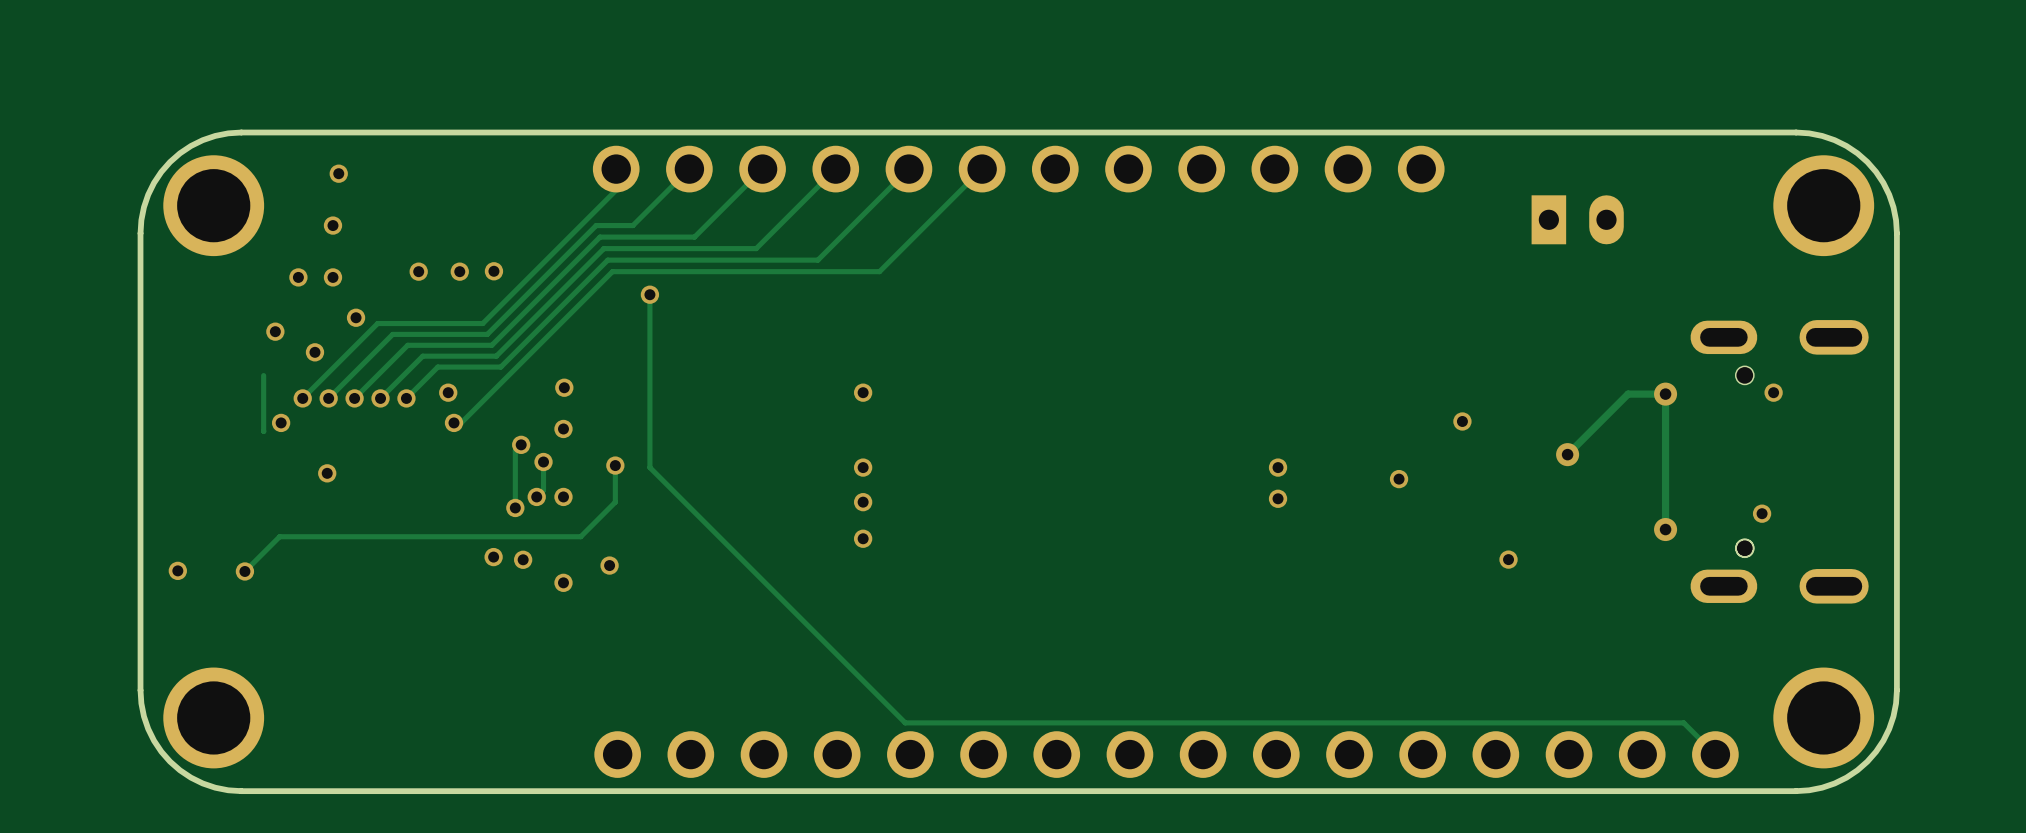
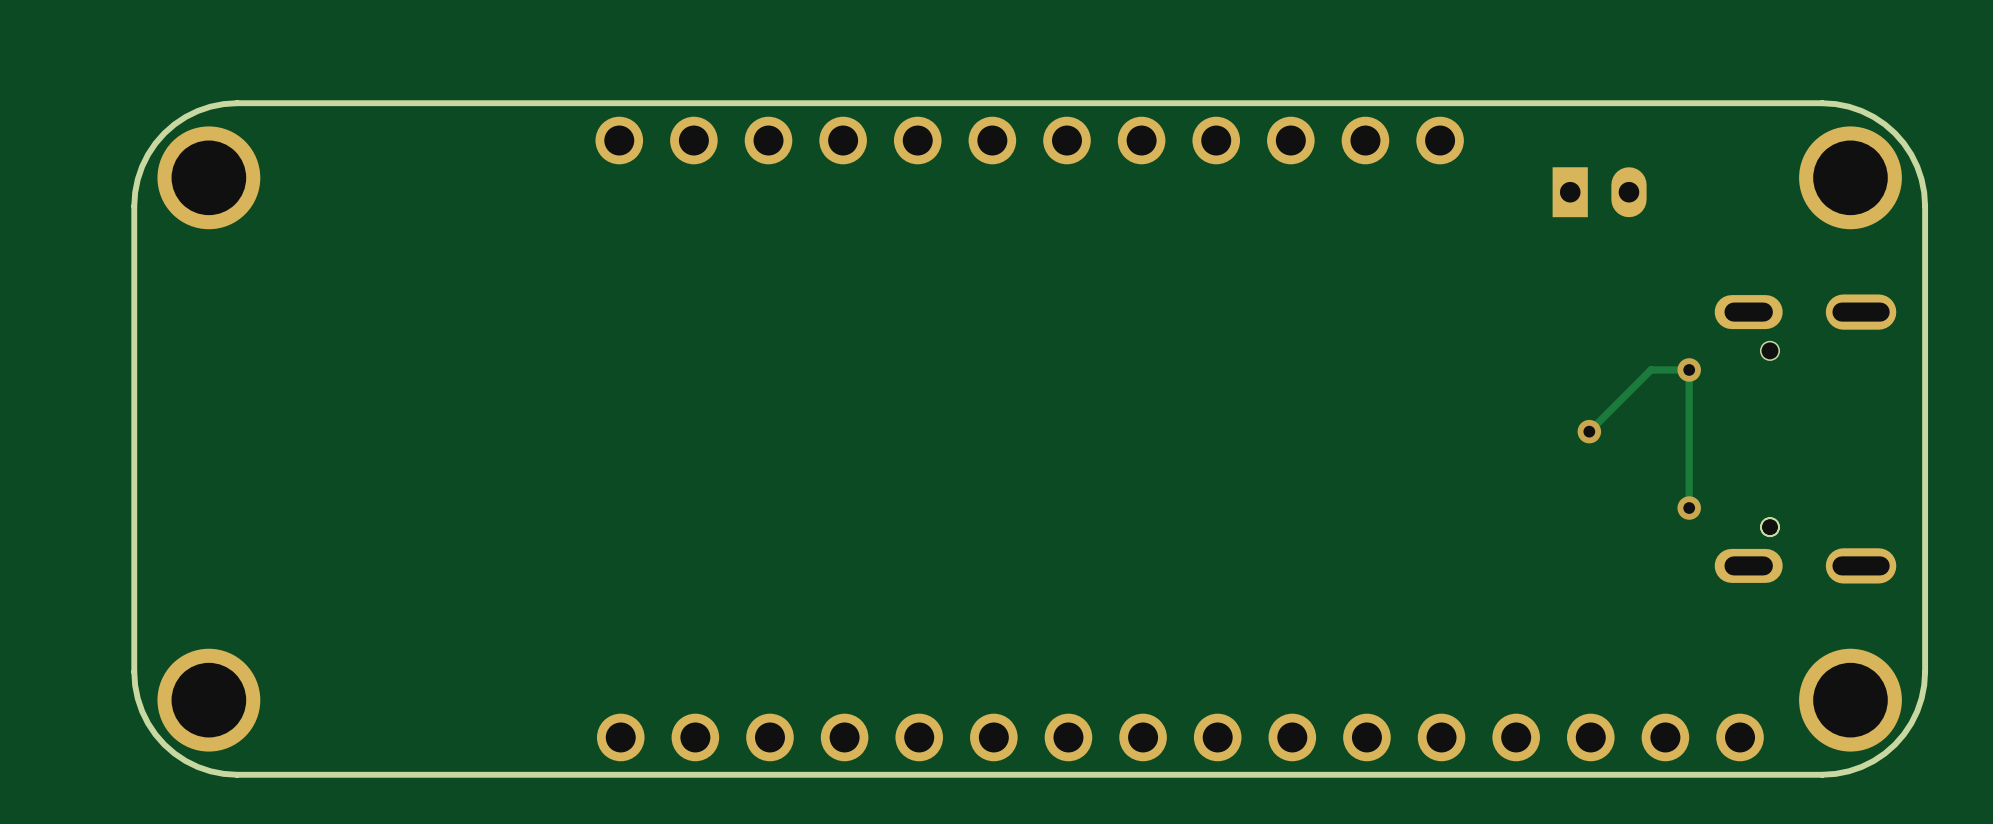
track: (616, 169) (616, 190) (482, 323) (377, 323) (302, 398) -> none
track: (689, 169) (632, 225) (596, 225) (487, 334) (392, 334) (328, 398) -> none
track: (762, 169) (694, 237) (600, 237) (491, 345) (407, 345) (354, 398) -> none
track: (835, 169) (756, 248) (603, 248) (496, 356) (422, 356) (380, 398) -> none
track: (908, 169) (817, 260) (607, 260) (500, 367) (437, 367) (406, 398) -> none
track: (982, 169) (879, 271) (612, 271) (461, 422) (454, 422) -> none
via: (338, 173) -> none
via: (332, 225) -> none
via: (418, 271) -> none
via: (459, 271) -> none
via: (493, 271) -> none
via: (298, 277) -> none
via: (332, 277) -> none
track: (649, 294) (649, 467) (905, 722) (1683, 722) (1715, 754) -> none
via: (649, 294) -> none
via: (356, 317) -> none
via: (275, 331) -> none
via: (314, 352) -> none
track: (263, 375) (263, 431) -> none
via: (564, 387) -> none
via: (448, 392) -> none
via: (863, 392) -> none
via: (1773, 392) -> none
via: (302, 398) -> none
via: (328, 398) -> none
via: (354, 398) -> none
via: (380, 398) -> none
via: (406, 398) -> none
via: (1462, 421) -> none
via: (281, 422) -> none
via: (454, 422) -> none
via: (563, 428) -> none
track: (521, 444) (515, 450) (515, 507) -> none
via: (521, 444) -> none
track: (543, 462) (543, 490) (536, 496) -> none
via: (543, 462) -> none
track: (615, 465) (615, 502) (580, 536) (279, 536) (244, 571) -> none
via: (615, 465) -> none
via: (863, 467) -> none
via: (1278, 467) -> none
via: (327, 473) -> none
via: (1399, 479) -> none
via: (536, 496) -> none
via: (563, 496) -> none
via: (1278, 498) -> none
via: (863, 502) -> none
via: (515, 507) -> none
via: (1762, 513) -> none
via: (863, 538) -> none
via: (493, 557) -> none
via: (523, 559) -> none
via: (1508, 559) -> none
via: (609, 565) -> none
via: (177, 570) -> none
via: (244, 571) -> none
via: (563, 582) -> none

